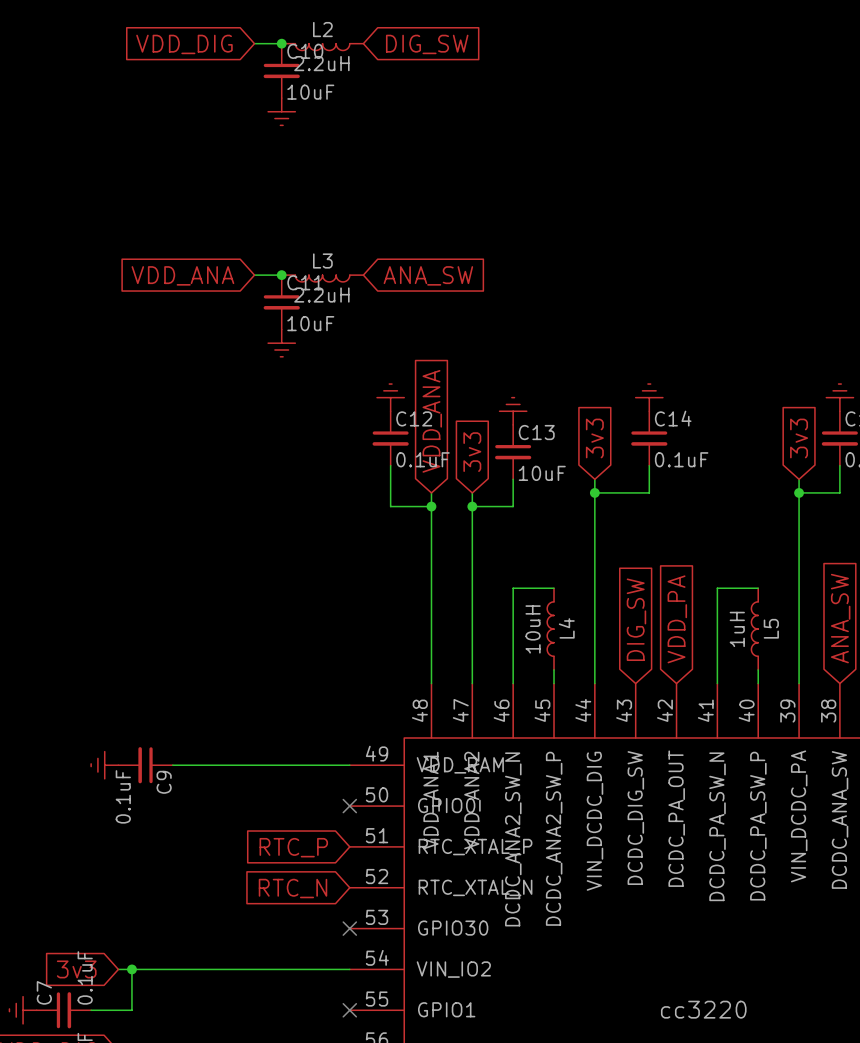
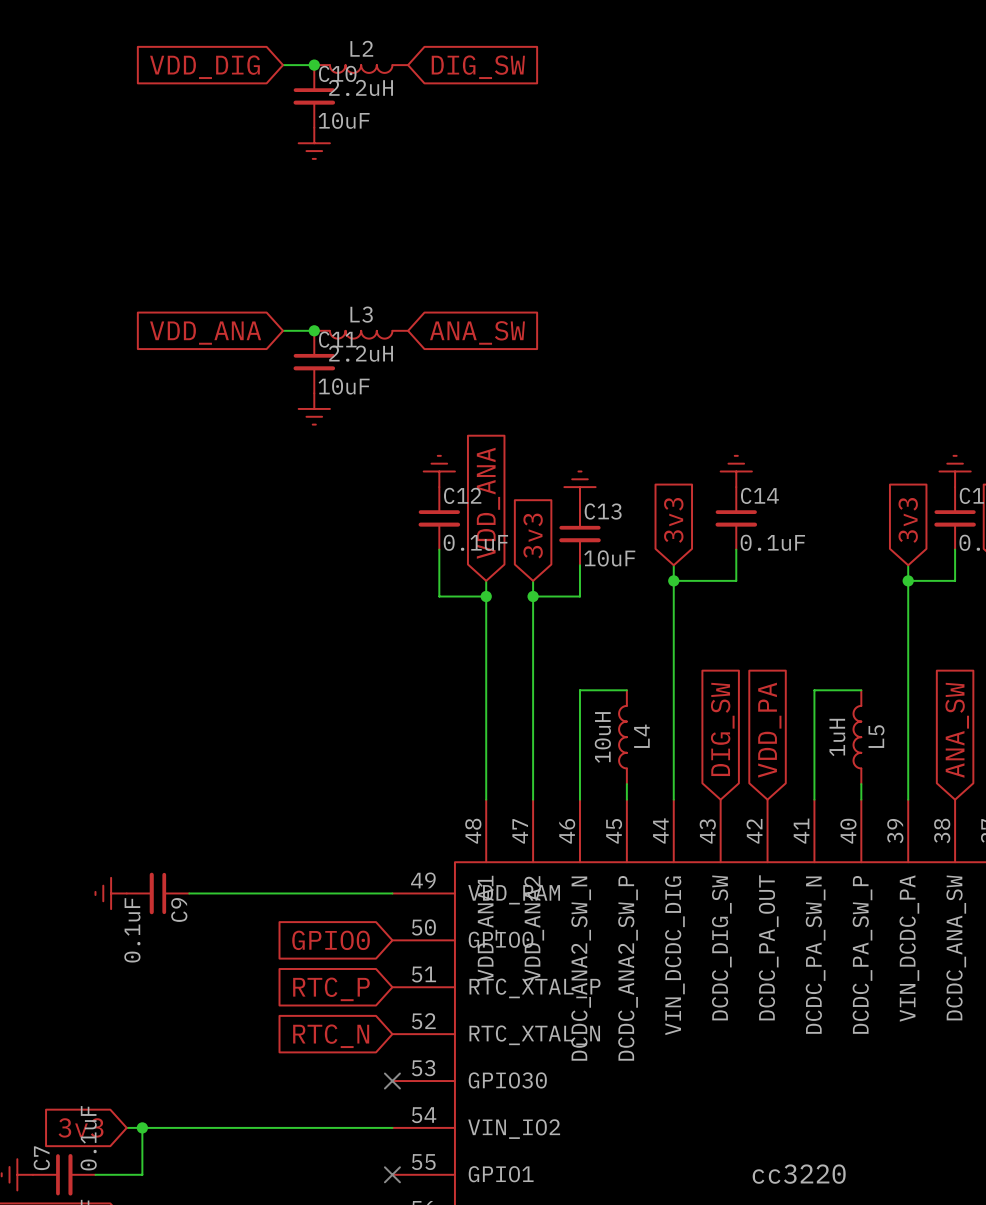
global label: none -> GPIO0 (331, 940)
no-connect mark: (349, 806) -> none

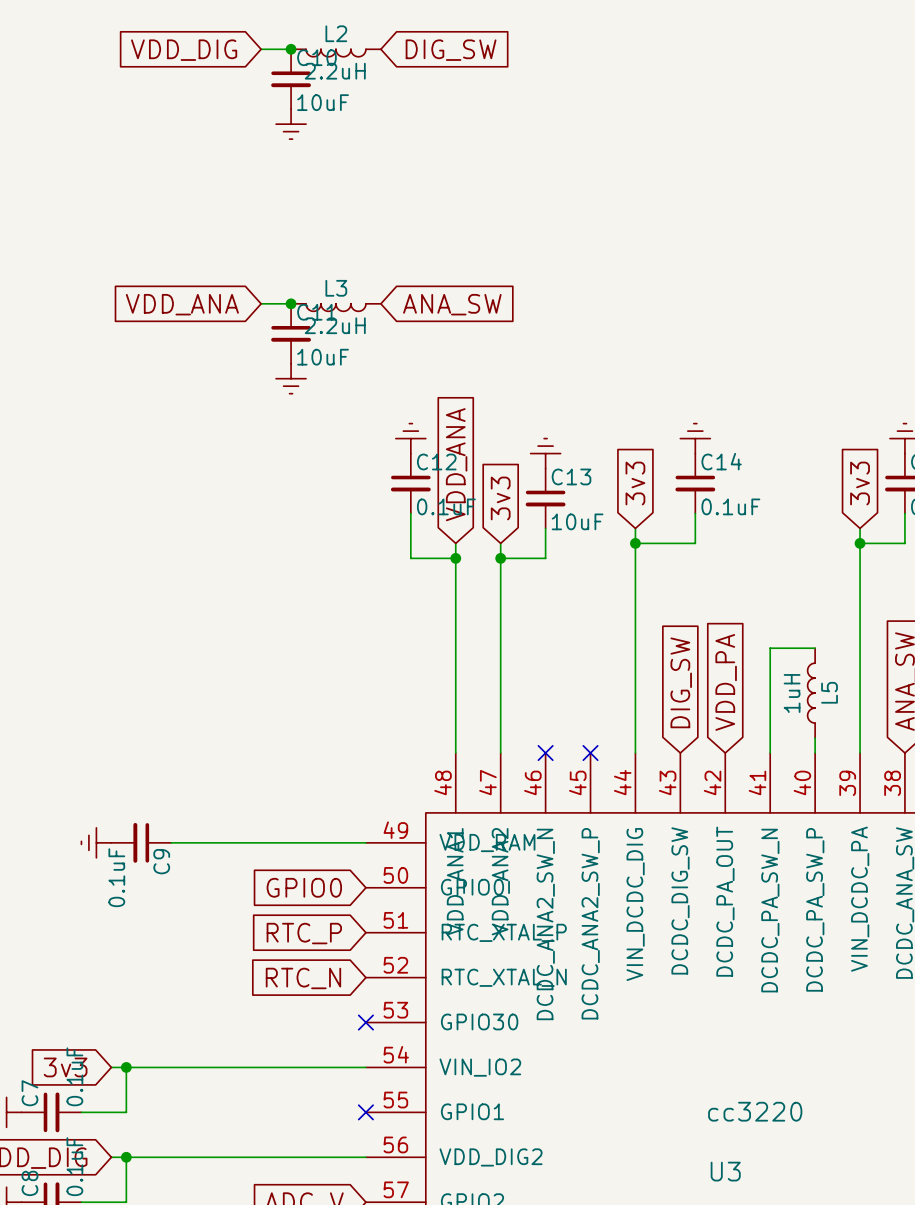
wire: (626, 690) (579, 690) (579, 799) -> none
L4: 10uH (622, 737) -> none
wire: (626, 784) (626, 799) -> none
no-connect mark: none -> (545, 753)
no-connect mark: none -> (590, 753)

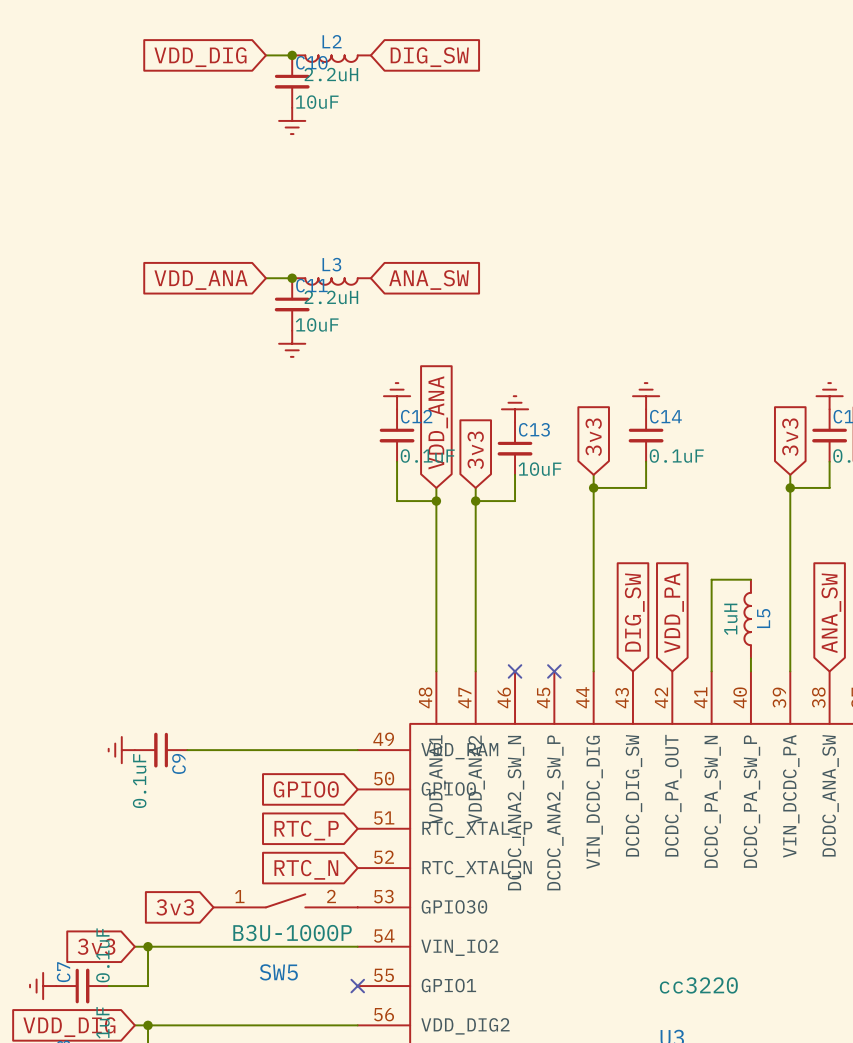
SW5: none -> B3U-1000P (285, 900)
global label: none -> 3v3 (175, 907)
no-connect mark: (365, 1022) -> none

